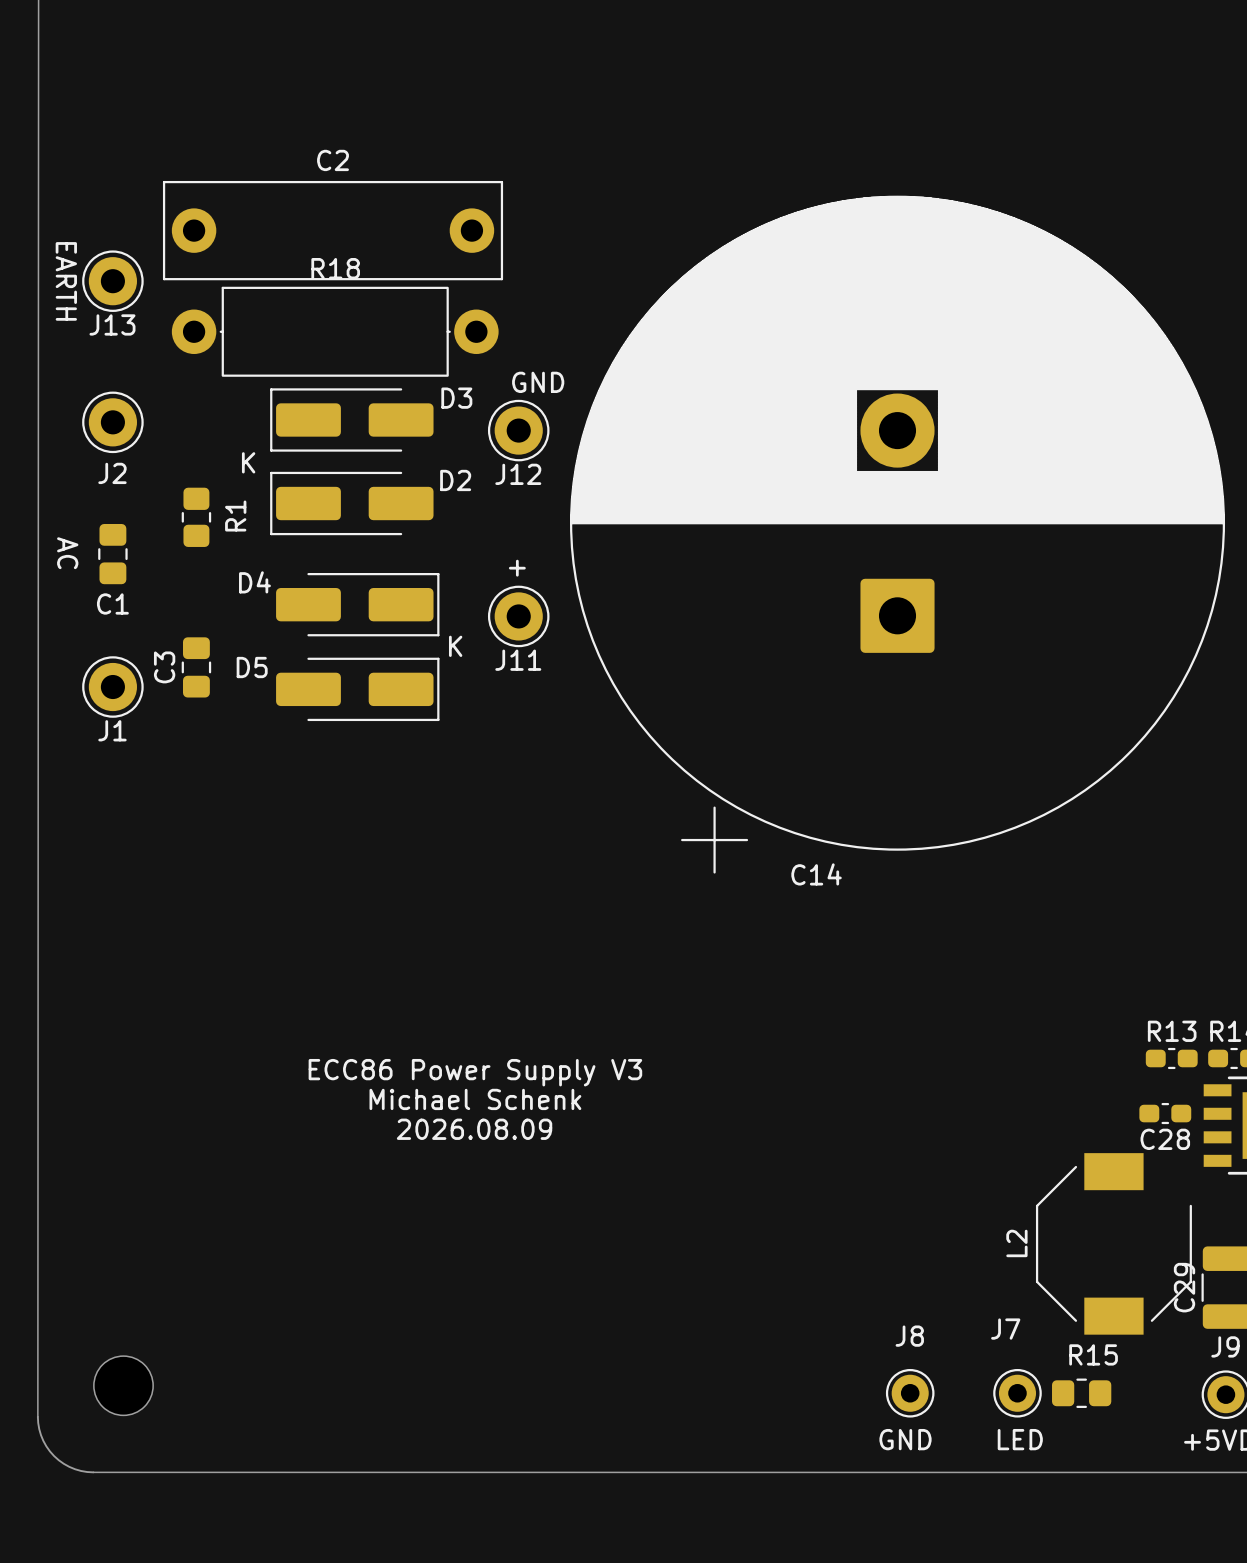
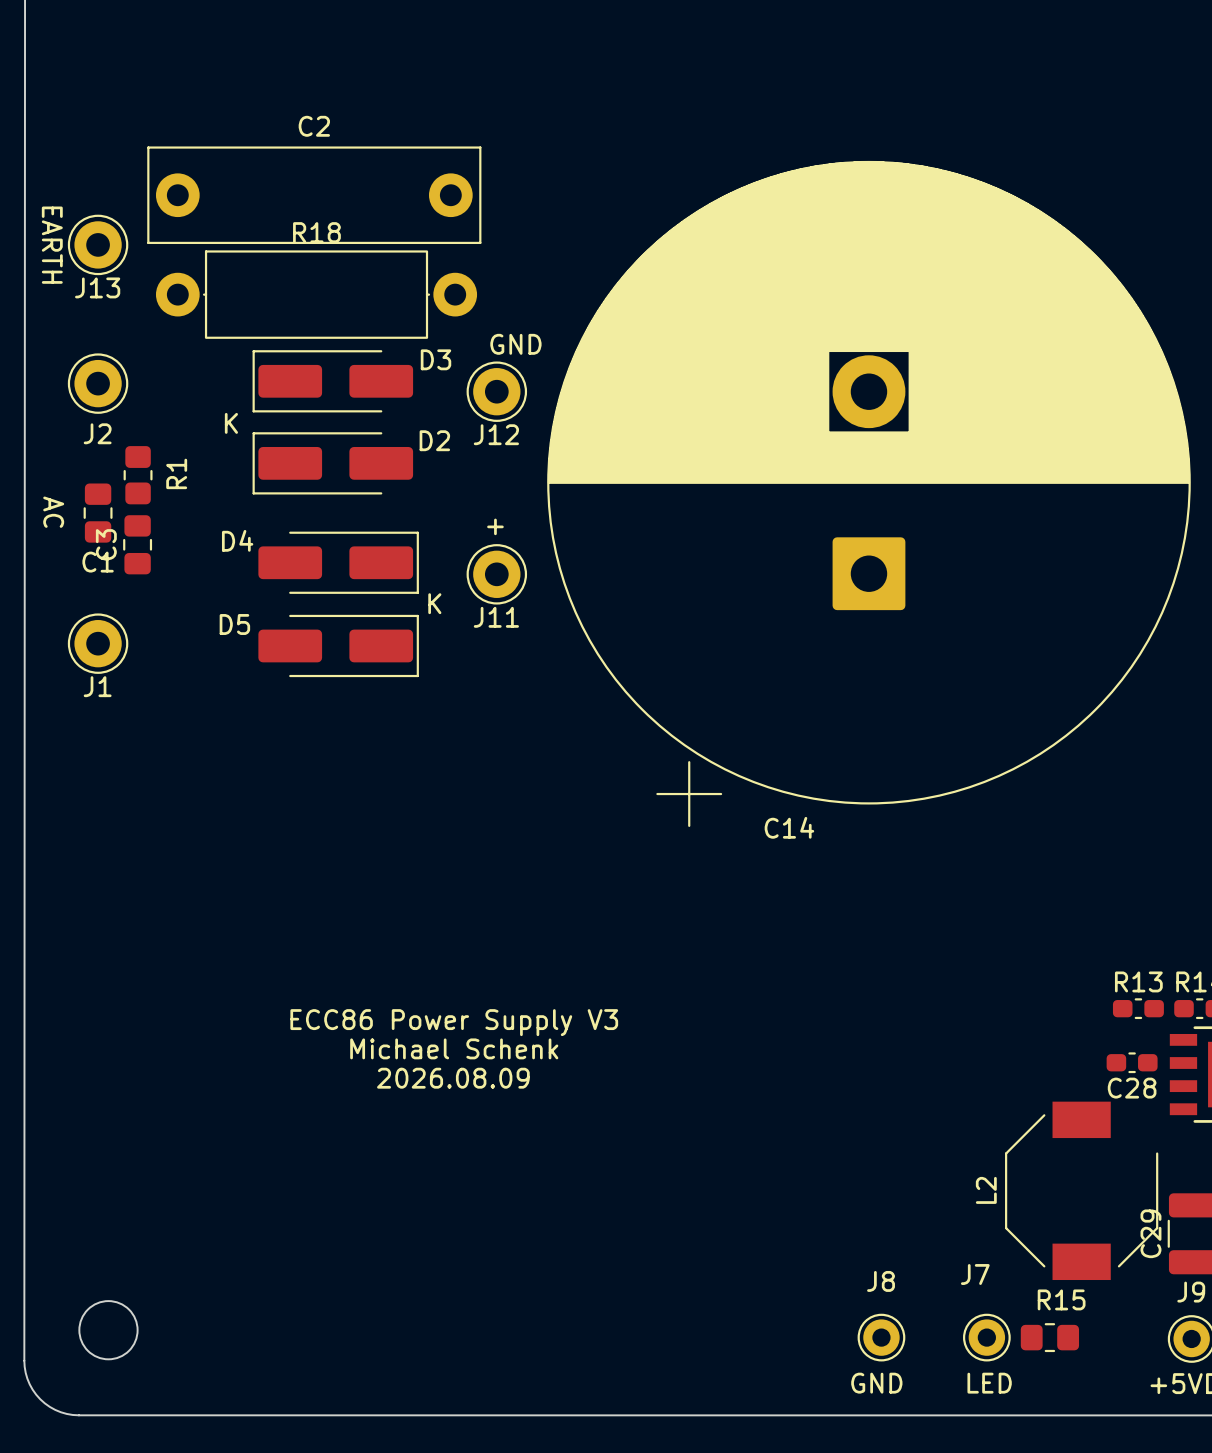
R1 position: (196, 517) -> (138, 475)
C3 position: (196, 667) -> (137, 544)

